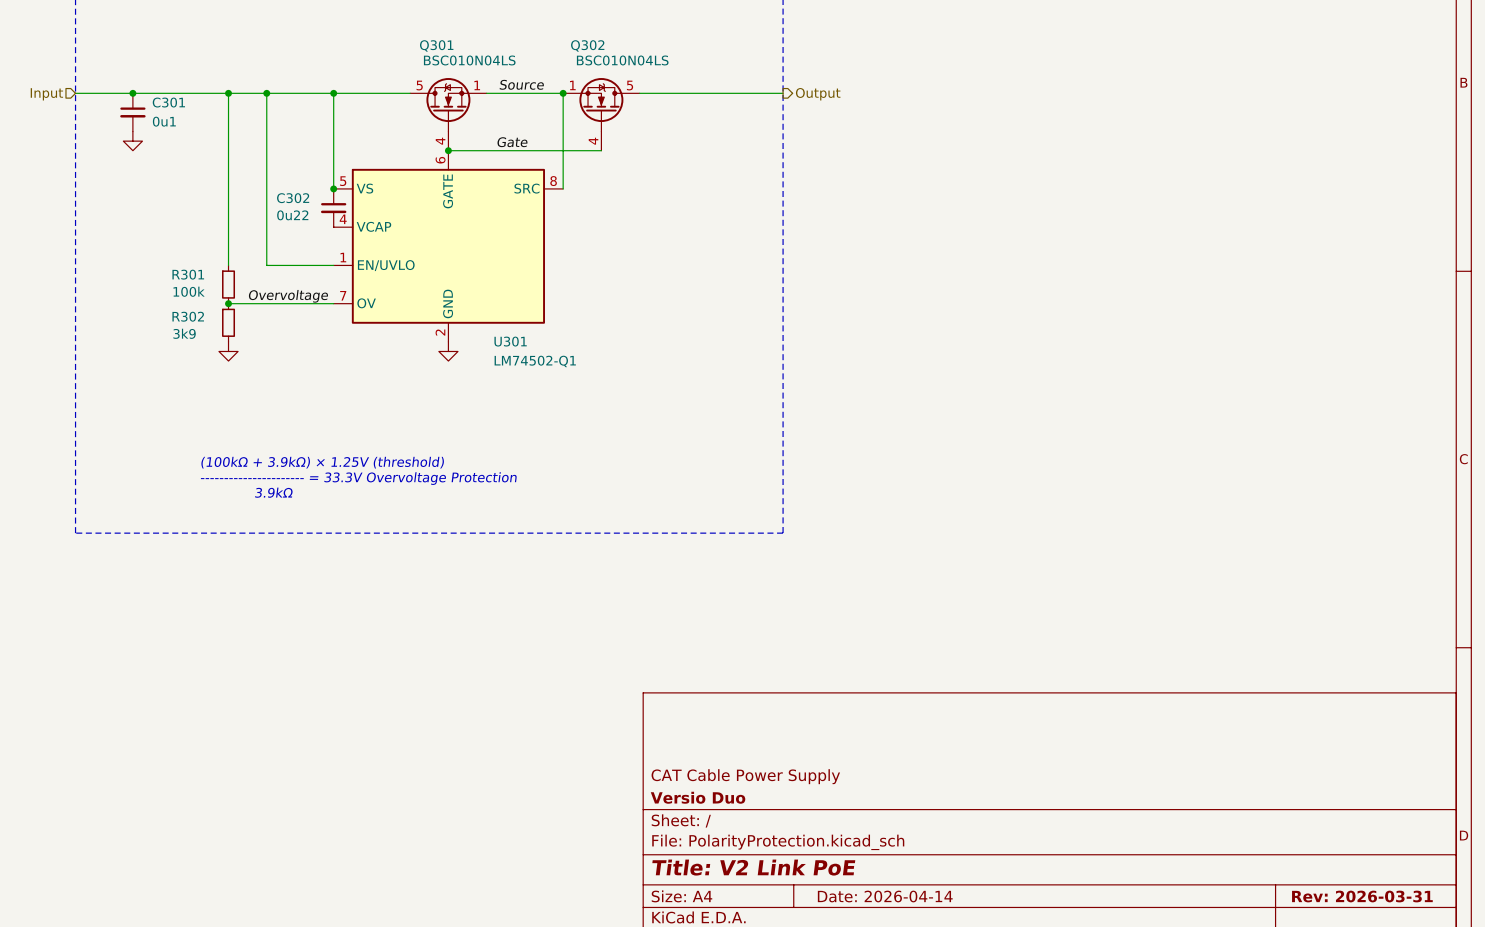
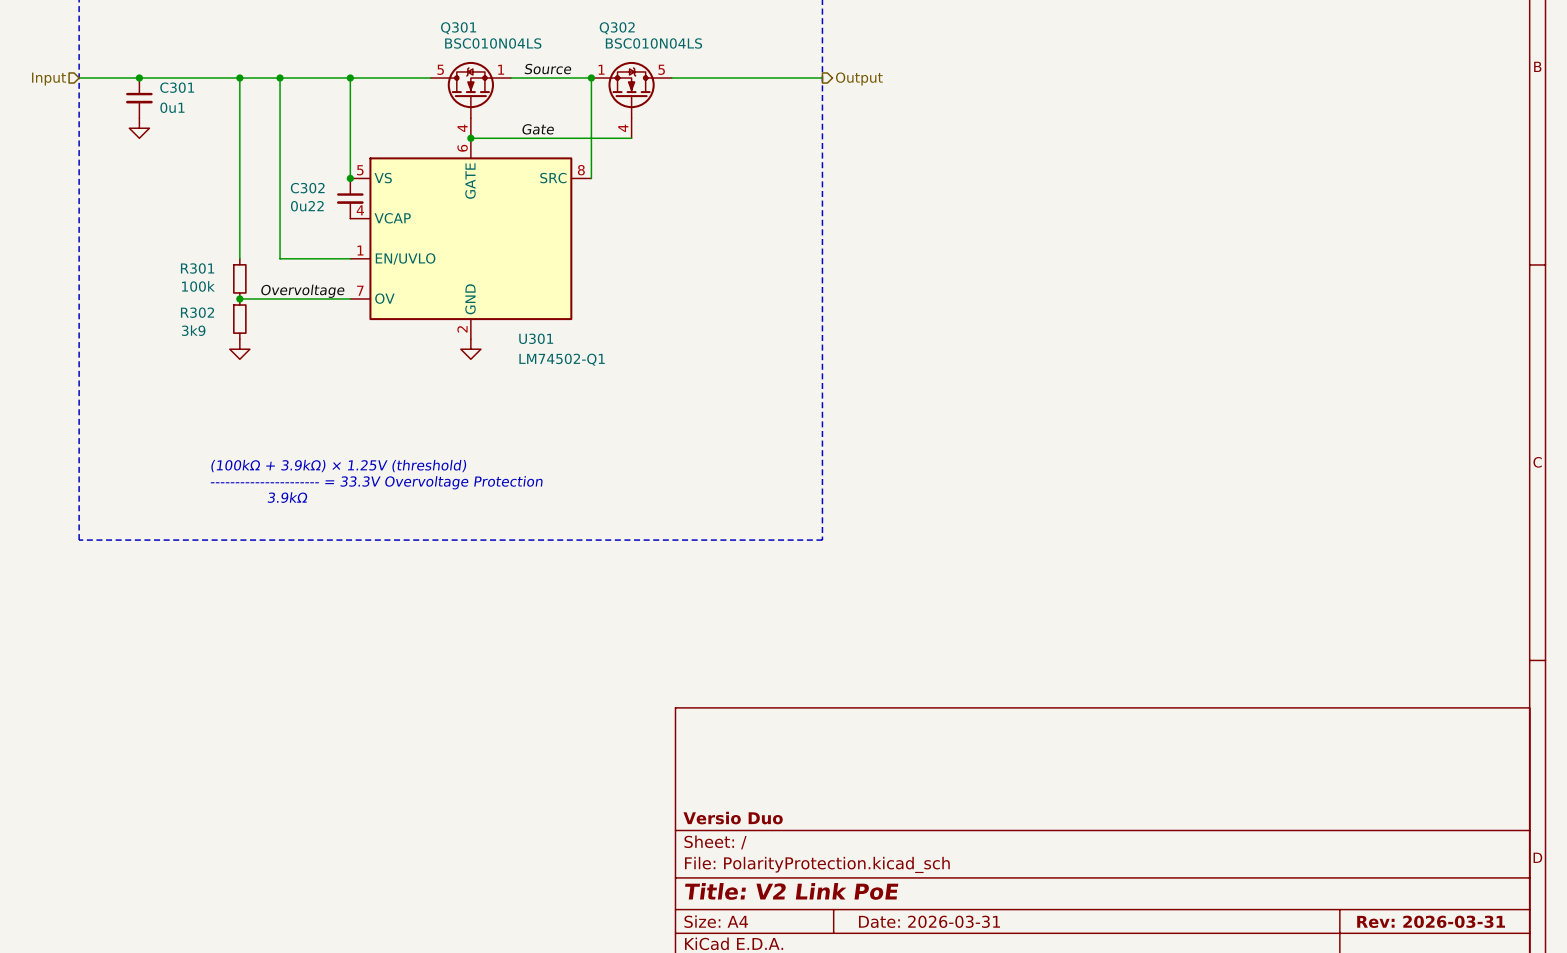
title block: CAT Cable Power Supply (745, 776) -> none
title block: Date: 2026-04-14 (885, 896) -> Date: 2026-03-31 (929, 921)

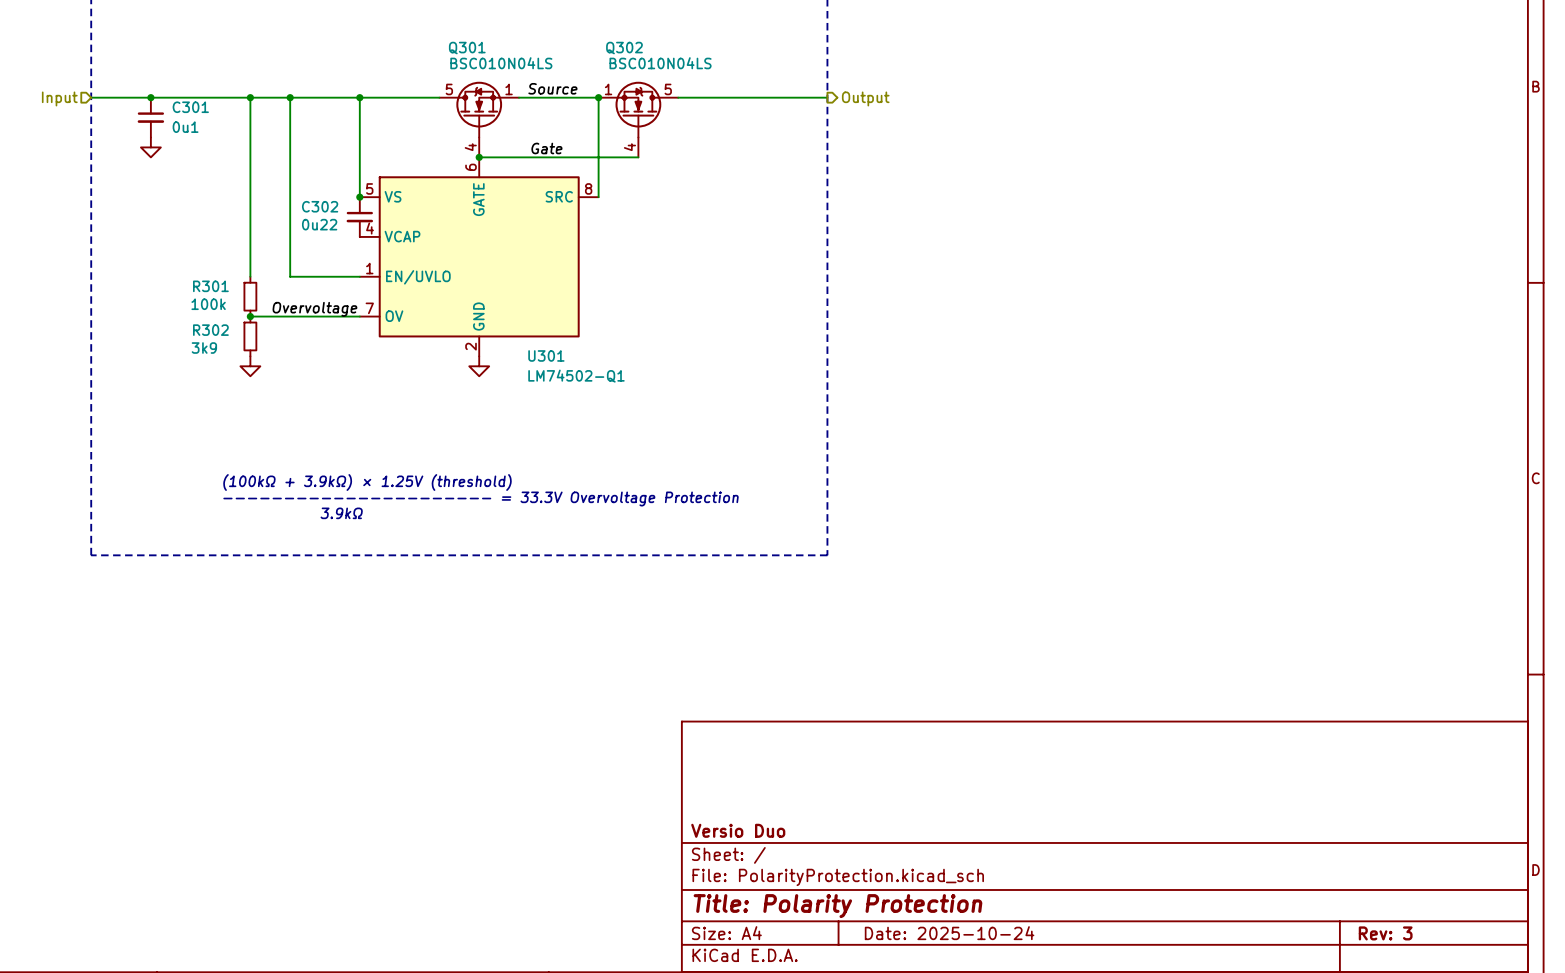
title block: Title: V2 Link PoE (791, 891) -> Title: Polarity Protection (838, 906)
title block: Date: 2026-03-31 (929, 921) -> Date: 2025-10-24 (949, 933)
title block: Rev: 2026-03-31 (1431, 921) -> Rev: 3 (1385, 933)

